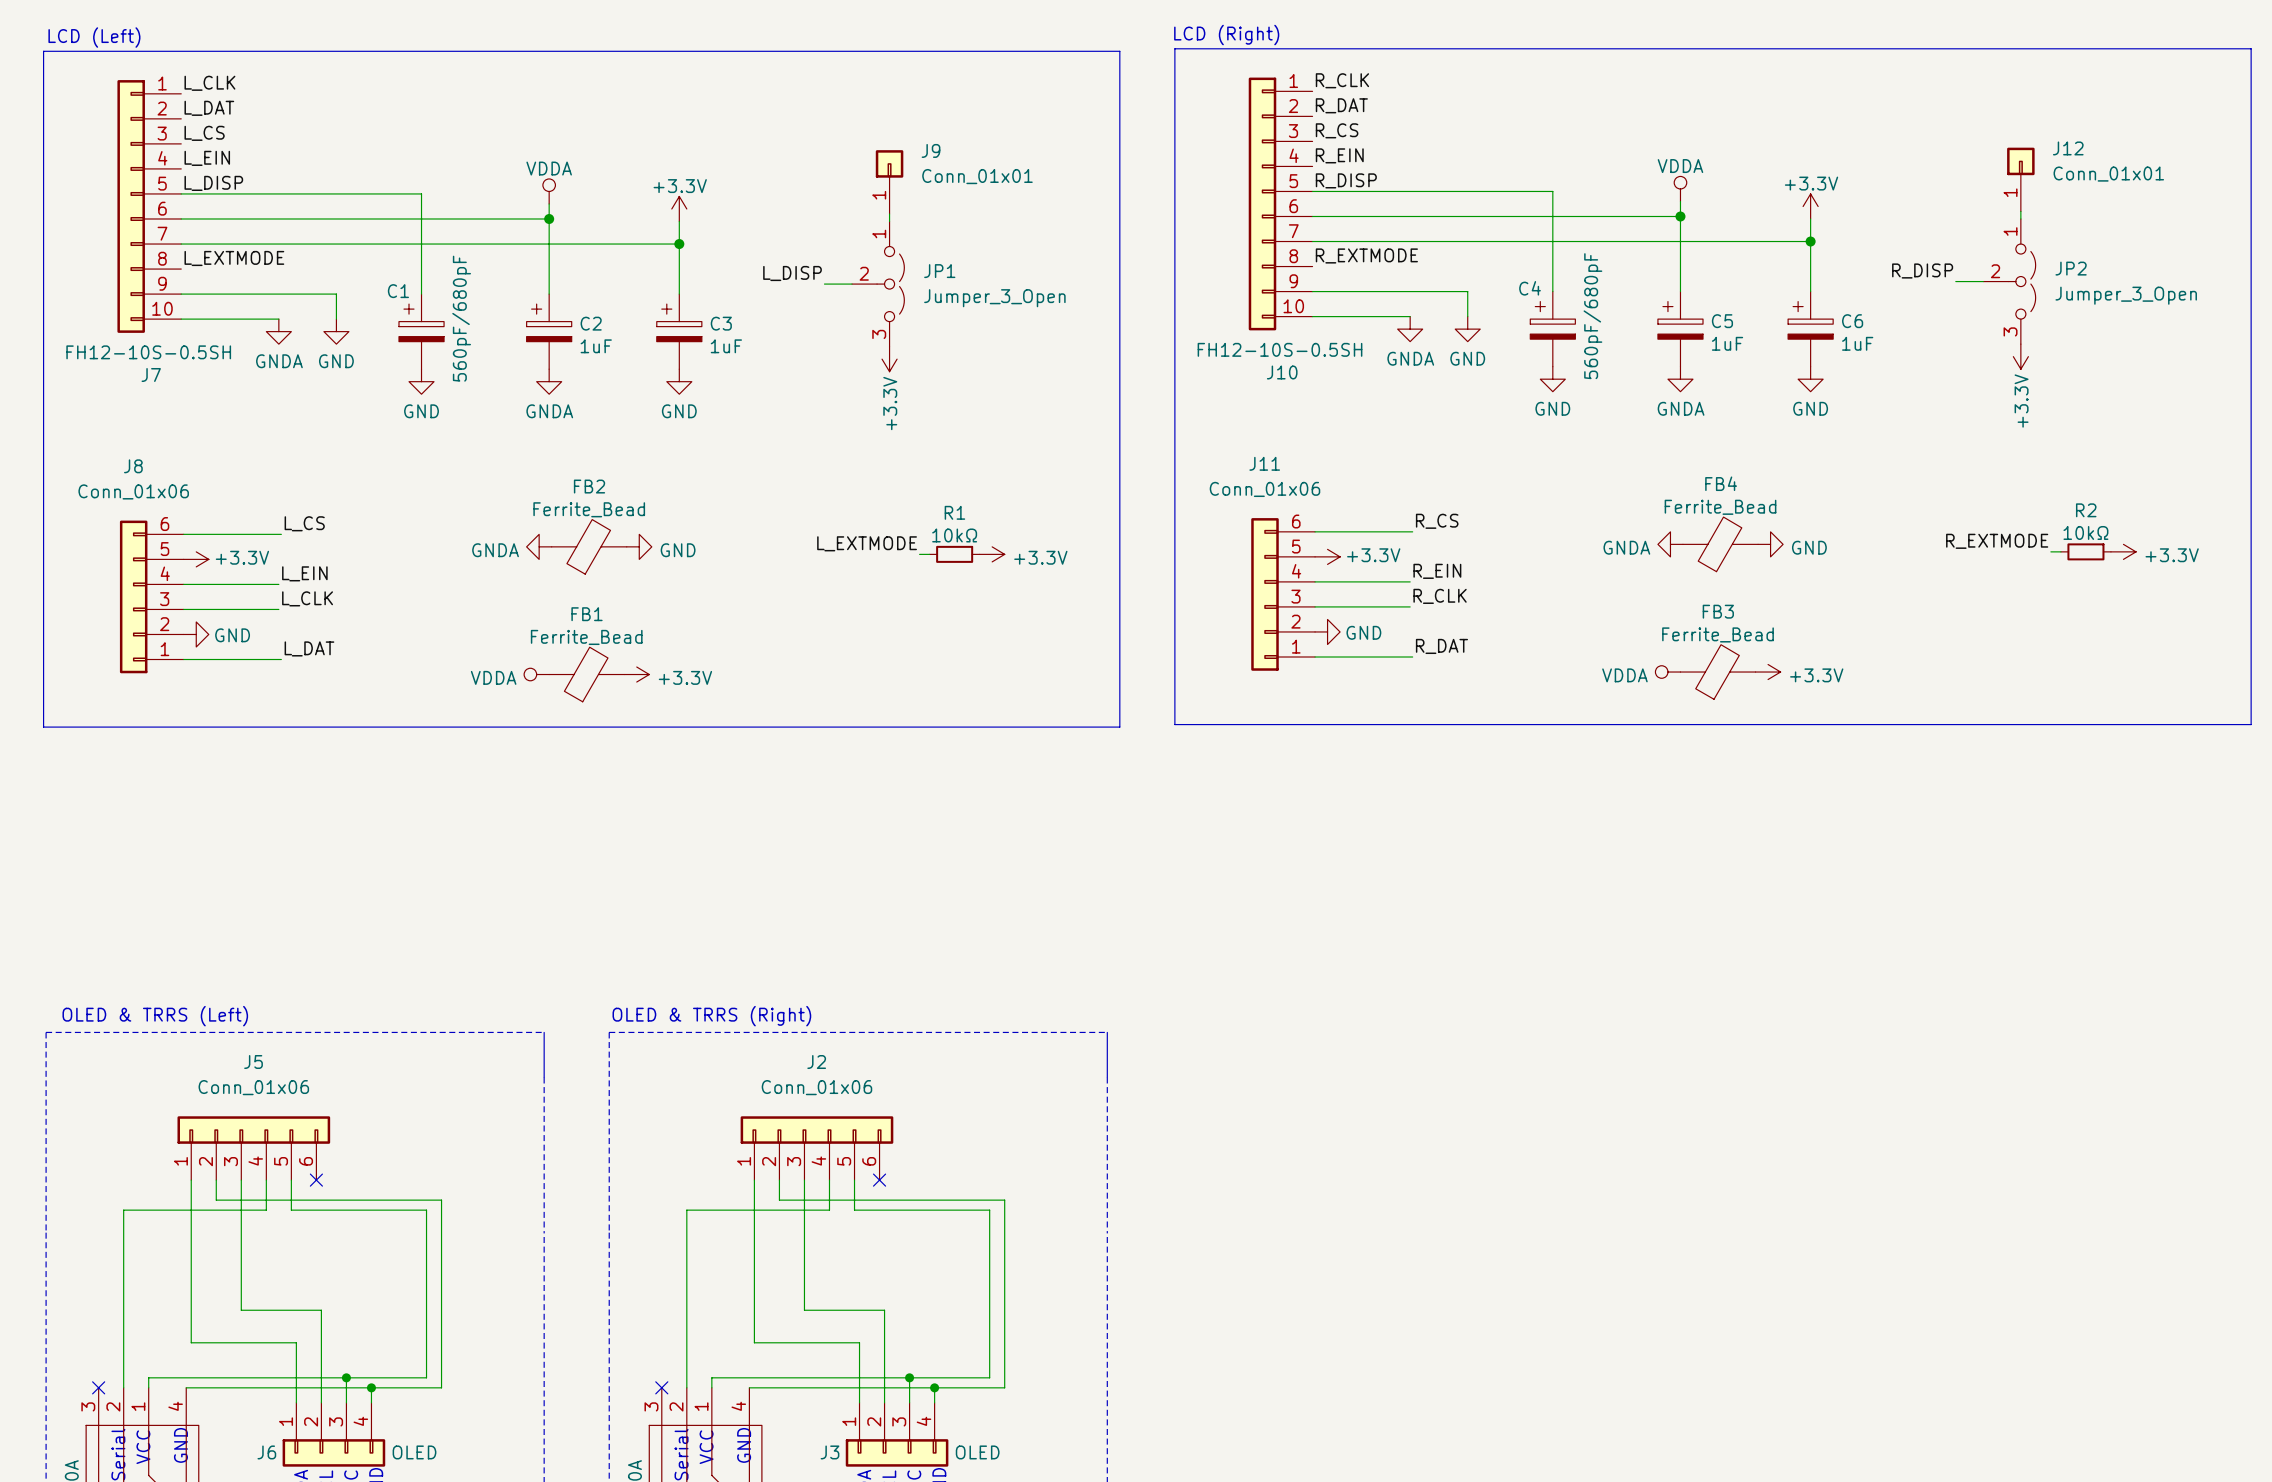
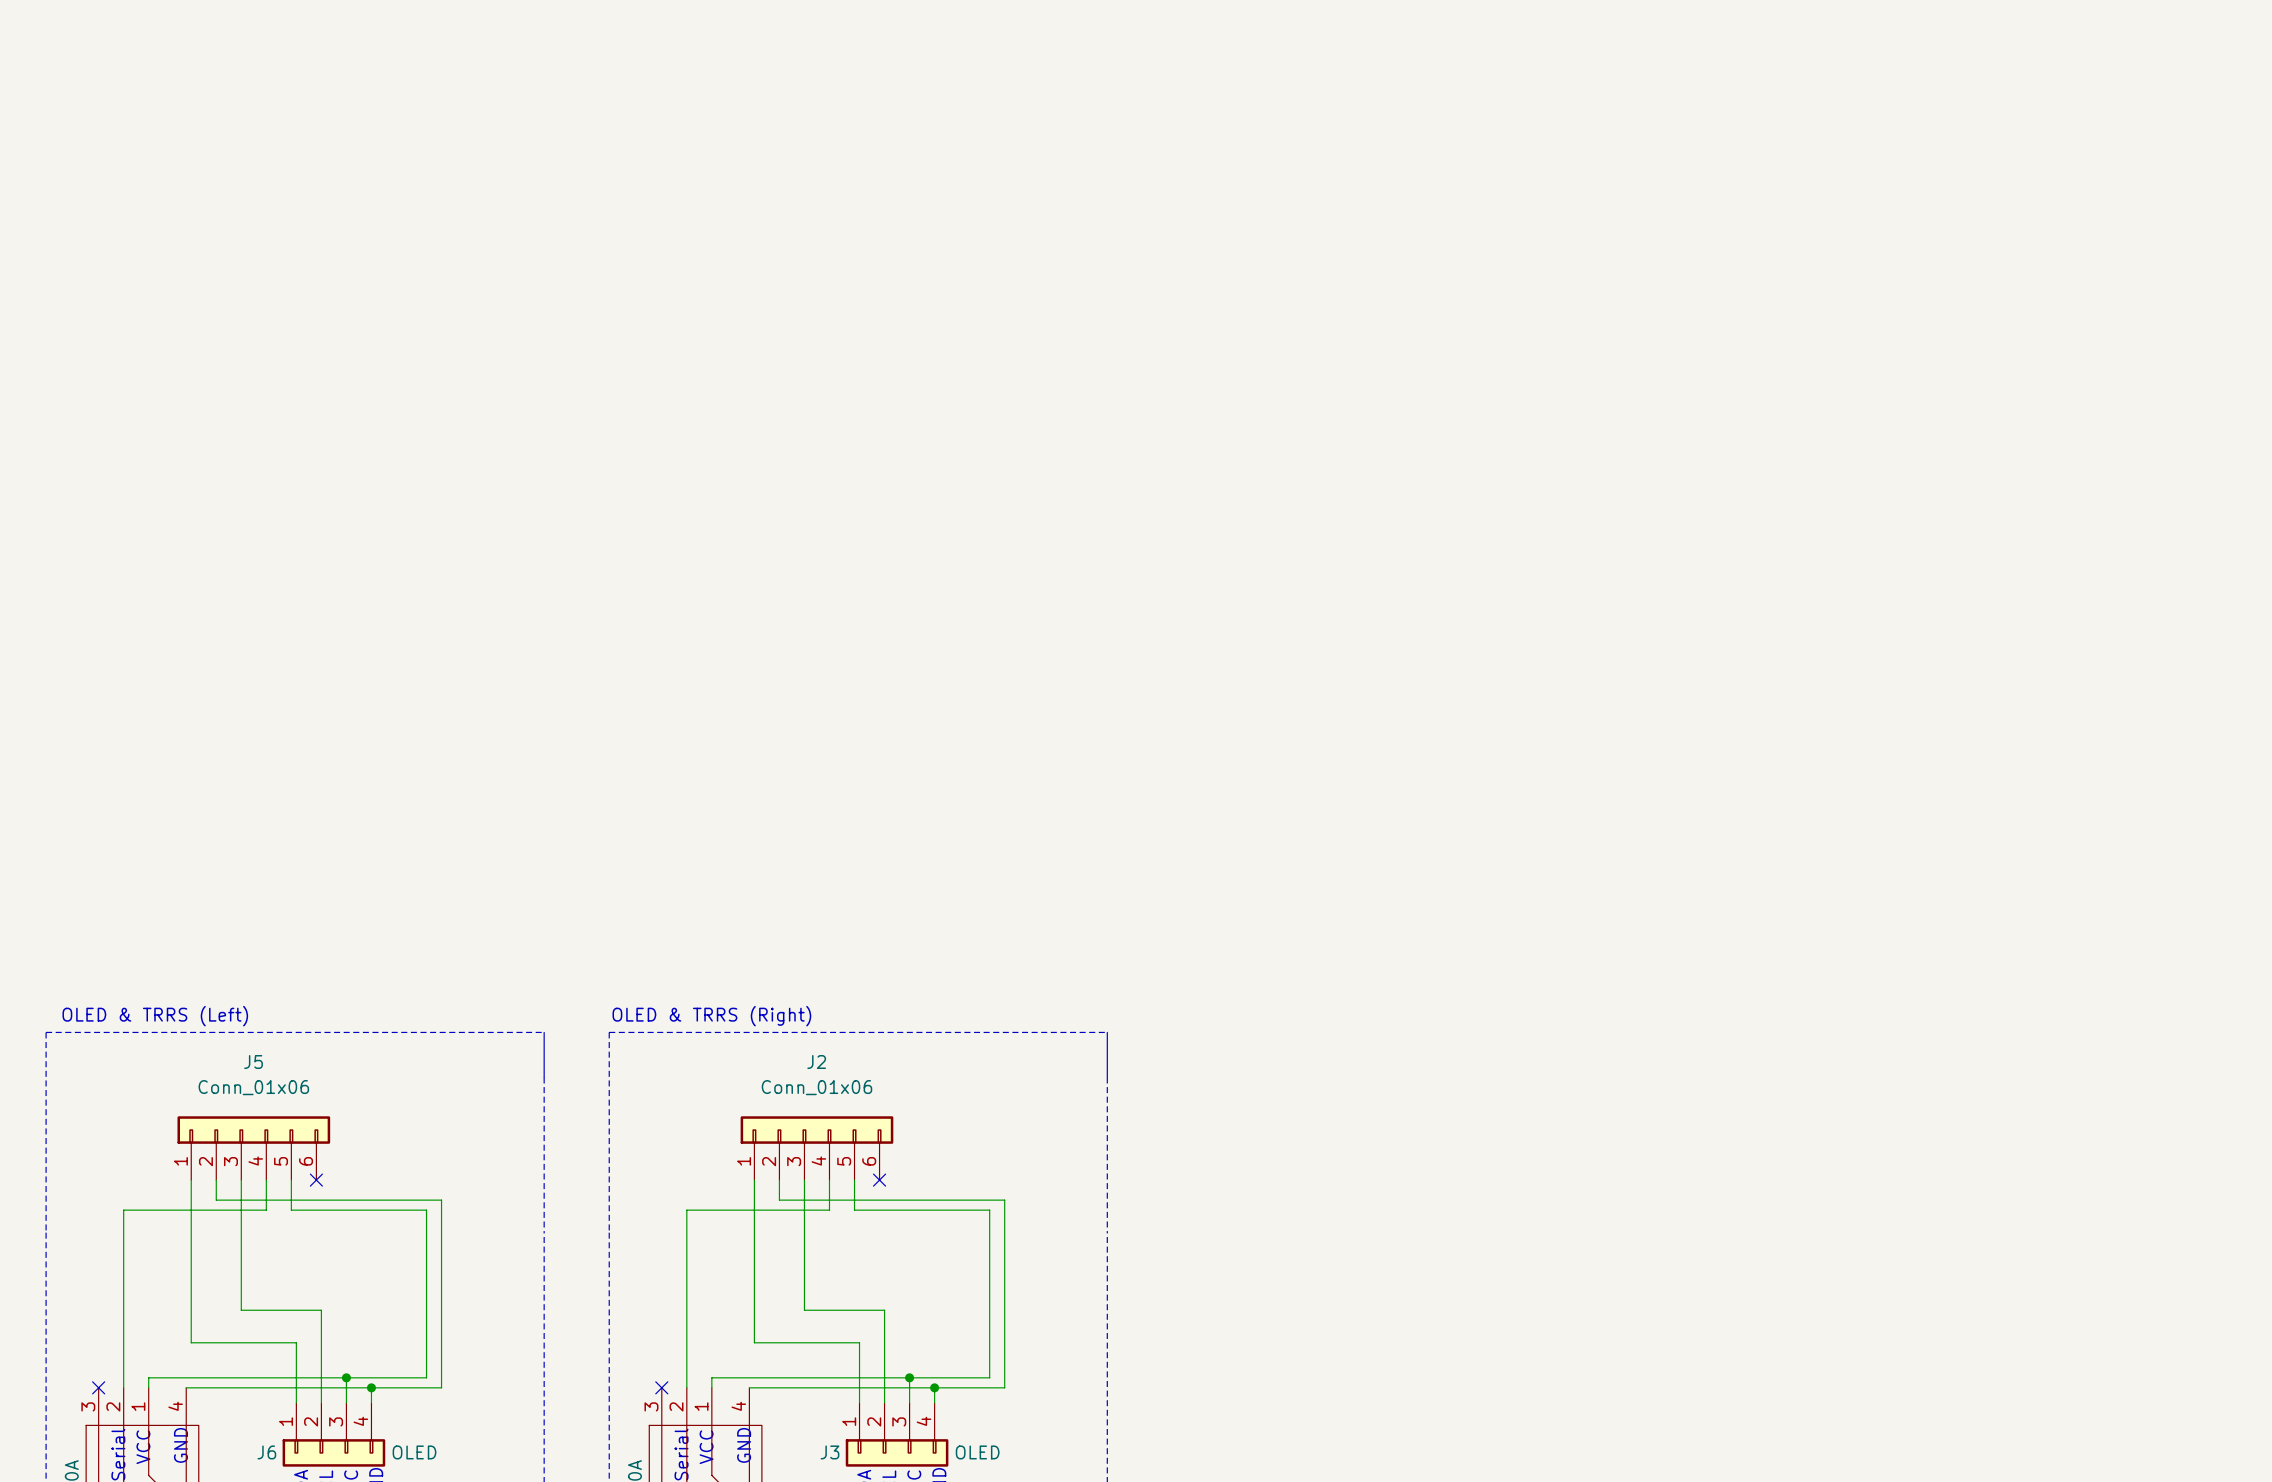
text: LCD (Right) (1226, 35) -> none
text: LCD (Left) (94, 37) -> none
line: (1174, 48) (1174, 724) (2251, 724) (2251, 48) (1174, 48) -> none
line: (43, 51) (43, 727) (1119, 727) (1119, 51) (43, 51) -> none
label: R_CLK (1342, 80) -> none
label: L_CLK (209, 83) -> none
label: R_DAT (1341, 105) -> none
label: L_DAT (209, 108) -> none
label: R_CS (1337, 130) -> none
label: L_CS (204, 133) -> none
label: R_EIN (1339, 155) -> none
label: L_EIN (207, 158) -> none
J12: Conn_01x01 (2020, 179) -> none
label: R_DISP (1346, 180) -> none
J9: Conn_01x01 (889, 182) -> none
label: L_DISP (213, 183) -> none
power symbol: VDDA (1680, 188) -> none
power symbol: VDDA (549, 191) -> none
wire: (1312, 191) (1552, 191) (1552, 291) -> none
wire: (181, 193) (421, 193) (421, 294) -> none
wire: (1680, 201) (1680, 291) -> none
wire: (549, 203) (549, 294) -> none
J10: FH12-10S-0.5SH (1280, 203) -> none
J7: FH12-10S-0.5SH (149, 206) -> none
power symbol: +3.3V (1810, 206) -> none
power symbol: +3.3V (679, 208) -> none
wire: (2020, 211) (2020, 218) -> none
wire: (889, 213) (889, 221) -> none
wire: (1312, 216) (1680, 216) -> none
junction: (1680, 216) -> none
wire: (181, 218) (549, 218) -> none
junction: (549, 218) -> none
wire: (1810, 218) (1810, 291) -> none
wire: (679, 221) (679, 294) -> none
wire: (1312, 241) (1810, 241) -> none
junction: (1810, 241) -> none
wire: (181, 244) (679, 244) -> none
junction: (679, 244) -> none
label: R_EXTMODE (1366, 255) -> none
label: L_EXTMODE (234, 258) -> none
label: R_DISP (1922, 270) -> none
label: L_DISP (792, 273) -> none
wire: (1955, 281) (1983, 281) -> none
JP2: Jumper_3_Open (2009, 281) -> none
wire: (824, 284) (852, 284) -> none
JP1: Jumper_3_Open (878, 284) -> none
wire: (1312, 291) (1467, 291) (1467, 316) -> none
wire: (181, 294) (336, 294) (336, 319) -> none
wire: (1312, 316) (1410, 316) -> none
wire: (181, 319) (278, 319) -> none
power symbol: GNDA (1410, 329) -> none
power symbol: GND (1467, 329) -> none
C4: 560pF/680pF (1552, 329) -> none
C5: 1uF (1680, 329) -> none
C6: 1uF (1810, 329) -> none
power symbol: GNDA (278, 331) -> none
power symbol: GND (336, 331) -> none
C1: 560pF/680pF (421, 331) -> none
C2: 1uF (549, 331) -> none
C3: 1uF (679, 331) -> none
power symbol: +3.3V (2020, 356) -> none
power symbol: +3.3V (889, 359) -> none
power symbol: GND (1552, 379) -> none
power symbol: GNDA (1680, 379) -> none
power symbol: GND (1810, 379) -> none
power symbol: GND (421, 381) -> none
power symbol: GNDA (549, 381) -> none
power symbol: GND (679, 381) -> none
label: R_CS (1437, 521) -> none
label: L_CS (304, 523) -> none
wire: (1315, 531) (1412, 531) -> none
wire: (183, 534) (281, 534) -> none
label: R_EXTMODE (1997, 541) -> none
label: L_EXTMODE (867, 543) -> none
power symbol: GNDA (1670, 544) -> none
FB4: Ferrite_Bead (1720, 544) -> none
power symbol: GND (1770, 544) -> none
power symbol: GNDA (539, 546) -> none
FB2: Ferrite_Bead (589, 546) -> none
power symbol: GND (639, 546) -> none
wire: (2050, 551) (2060, 551) -> none
R2: 10kΩ (2085, 551) -> none
power symbol: +3.3V (2123, 551) -> none
wire: (919, 554) (929, 554) -> none
R1: 10kΩ (954, 554) -> none
power symbol: +3.3V (992, 554) -> none
power symbol: +3.3V (1327, 556) -> none
power symbol: +3.3V (196, 559) -> none
label: R_EIN (1437, 571) -> none
label: L_EIN (304, 573) -> none
wire: (1315, 581) (1410, 581) -> none
wire: (183, 584) (278, 584) -> none
J11: Conn_01x06 (1283, 594) -> none
J8: Conn_01x06 (151, 596) -> none
label: R_CLK (1440, 596) -> none
label: L_CLK (307, 598) -> none
wire: (1315, 606) (1410, 606) -> none
wire: (183, 609) (278, 609) -> none
power symbol: GND (1327, 631) -> none
power symbol: GND (196, 634) -> none
label: R_DAT (1441, 646) -> none
label: L_DAT (309, 648) -> none
wire: (1315, 657) (1412, 657) -> none
wire: (183, 659) (281, 659) -> none
power symbol: VDDA (1667, 672) -> none
FB3: Ferrite_Bead (1718, 672) -> none
power symbol: +3.3V (1768, 672) -> none
power symbol: VDDA (536, 674) -> none
FB1: Ferrite_Bead (586, 674) -> none
power symbol: +3.3V (636, 674) -> none

